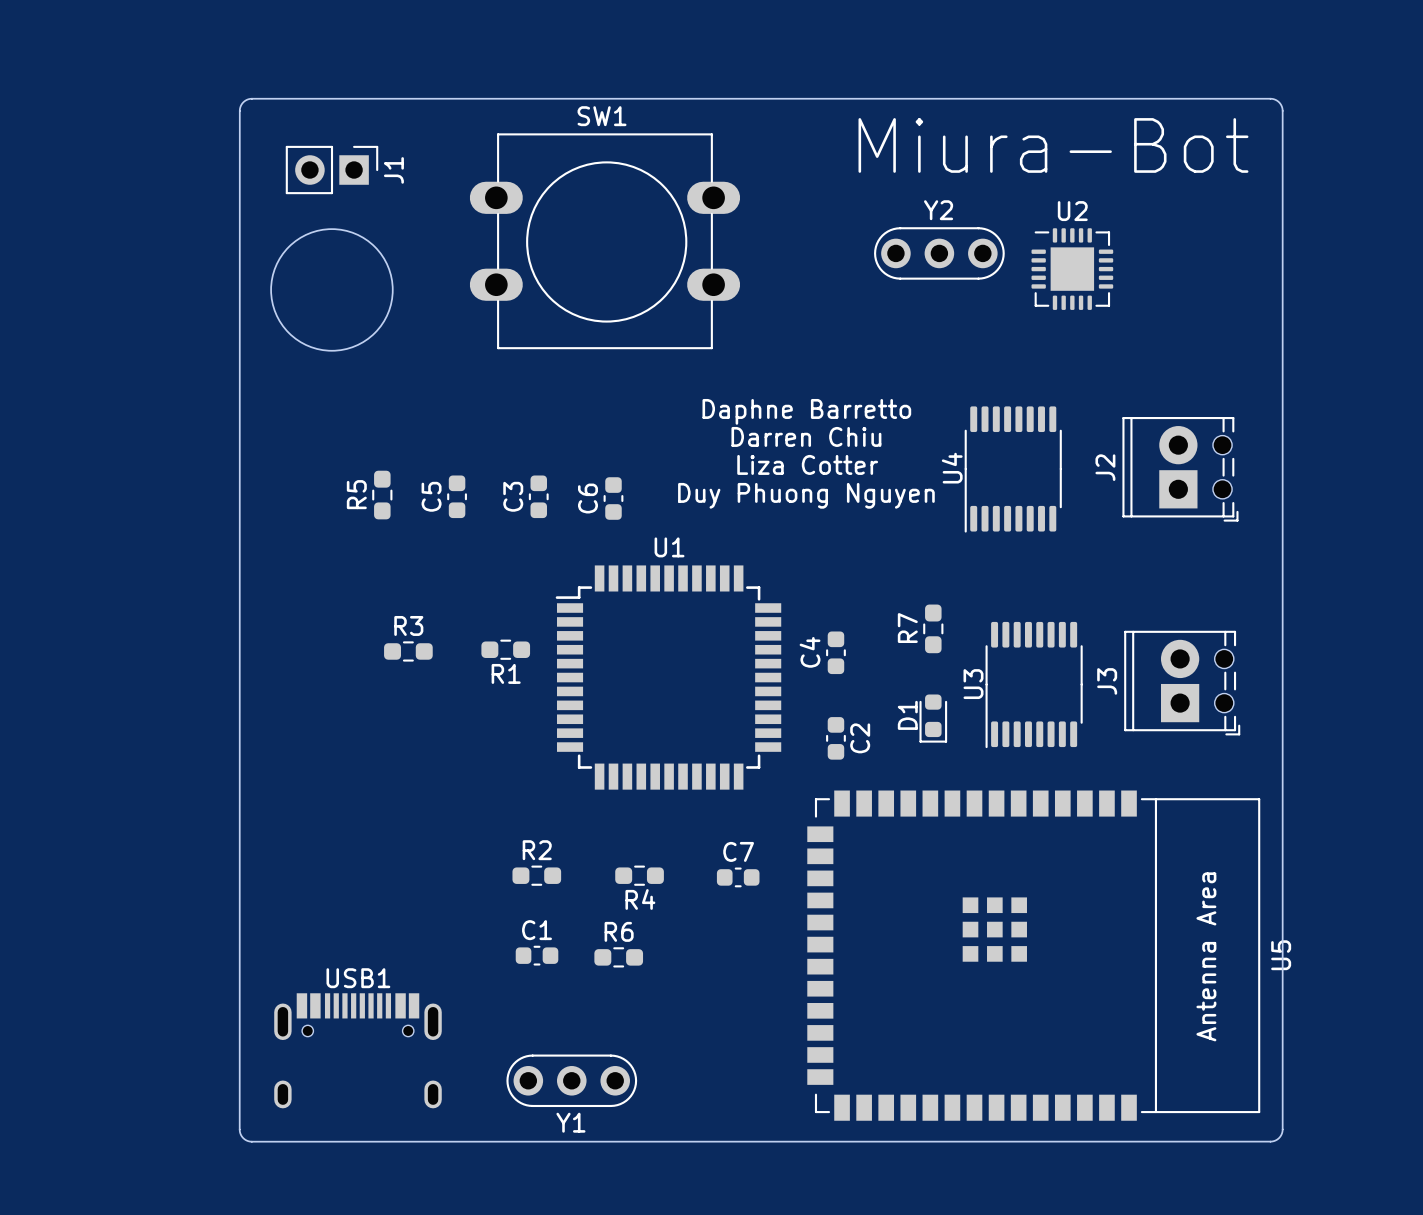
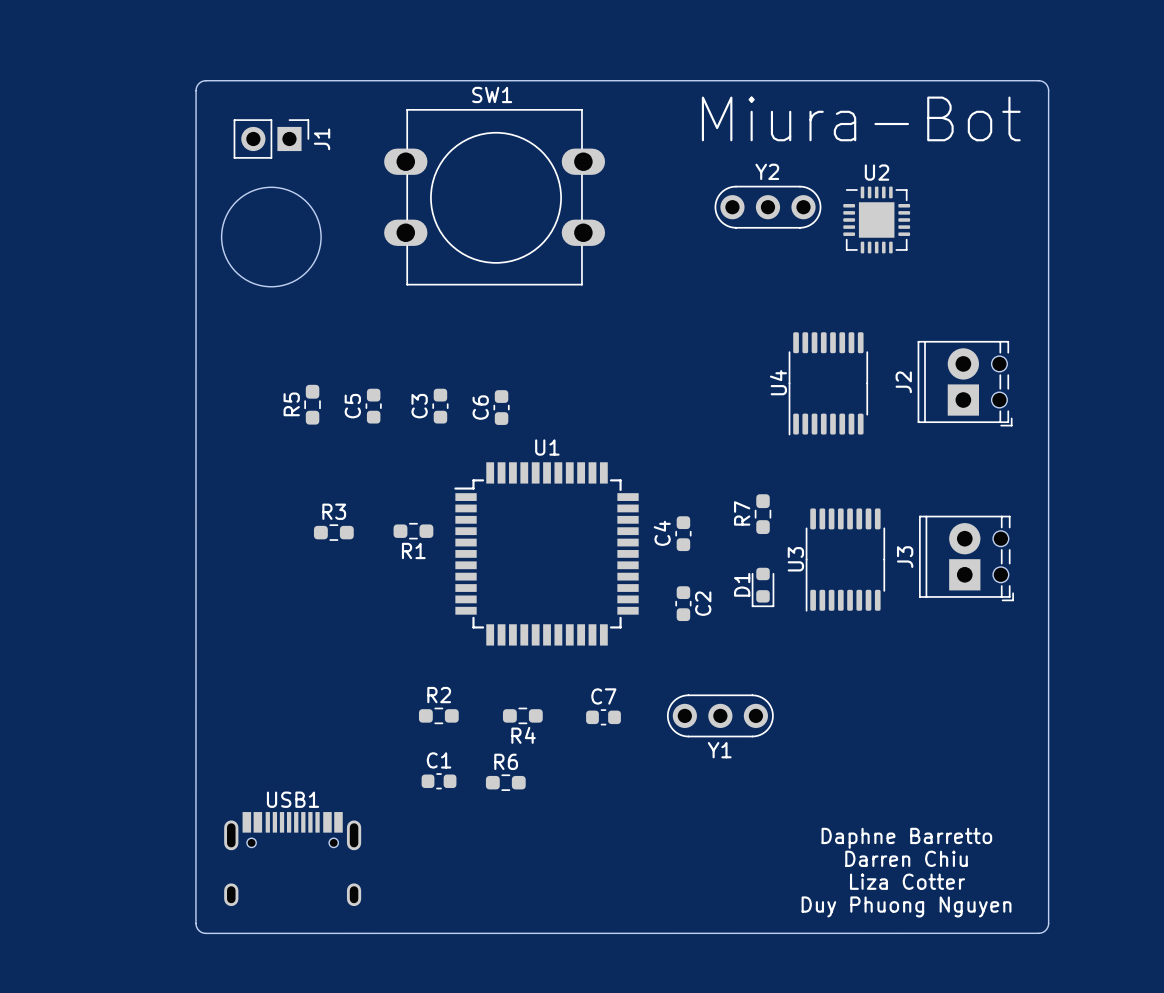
text: Daphne Barretto (806, 411) -> none
text: Darren Chiu (806, 436) -> none
text: Liza Cotter (807, 464) -> none
text: Duy Phuong Nguyen (806, 495) -> none
U5: (1033, 955) -> none
text: none -> Daphne Barretto (906, 838)
text: none -> Darren Chiu (906, 858)
text: none -> Liza Cotter (907, 881)
Y1 position: (571, 1080) -> (720, 715)
text: none -> Duy Phuong Nguyen (906, 906)

